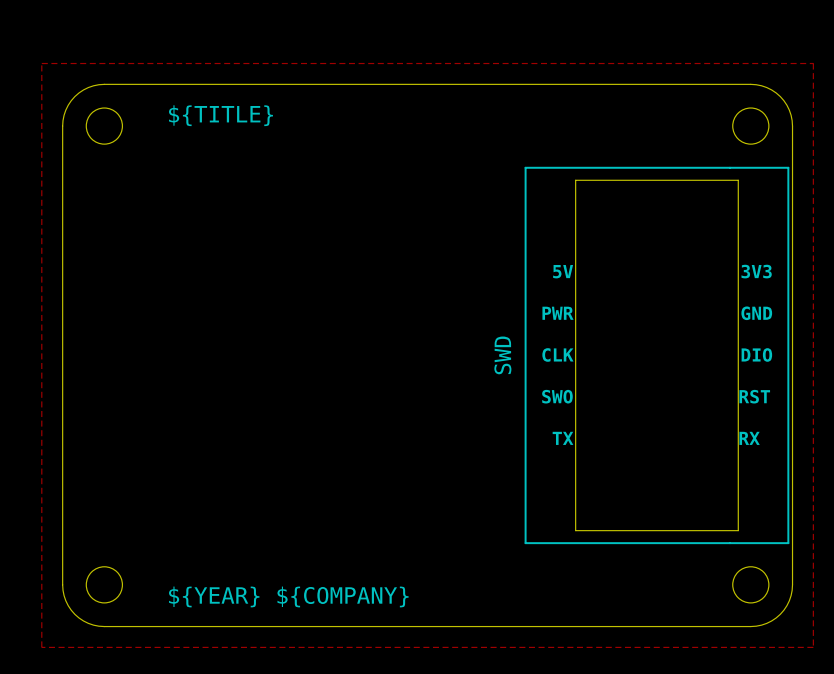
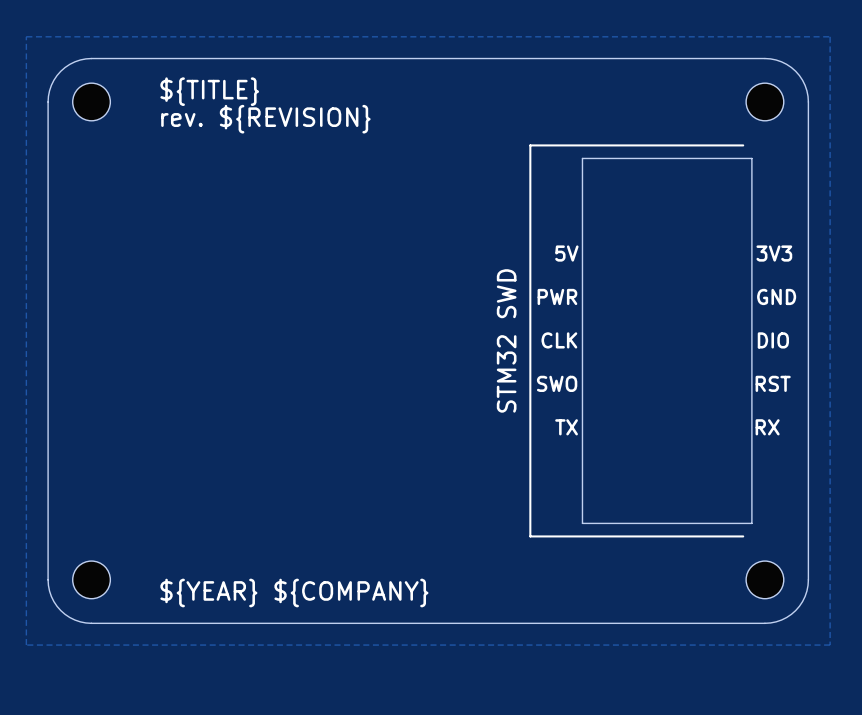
text: none -> rev. ${REVISION} (265, 119)
line: (729, 167) (788, 167) (788, 543) (729, 543) -> none
text: SWD (502, 355) -> STM32 SWD (506, 340)

